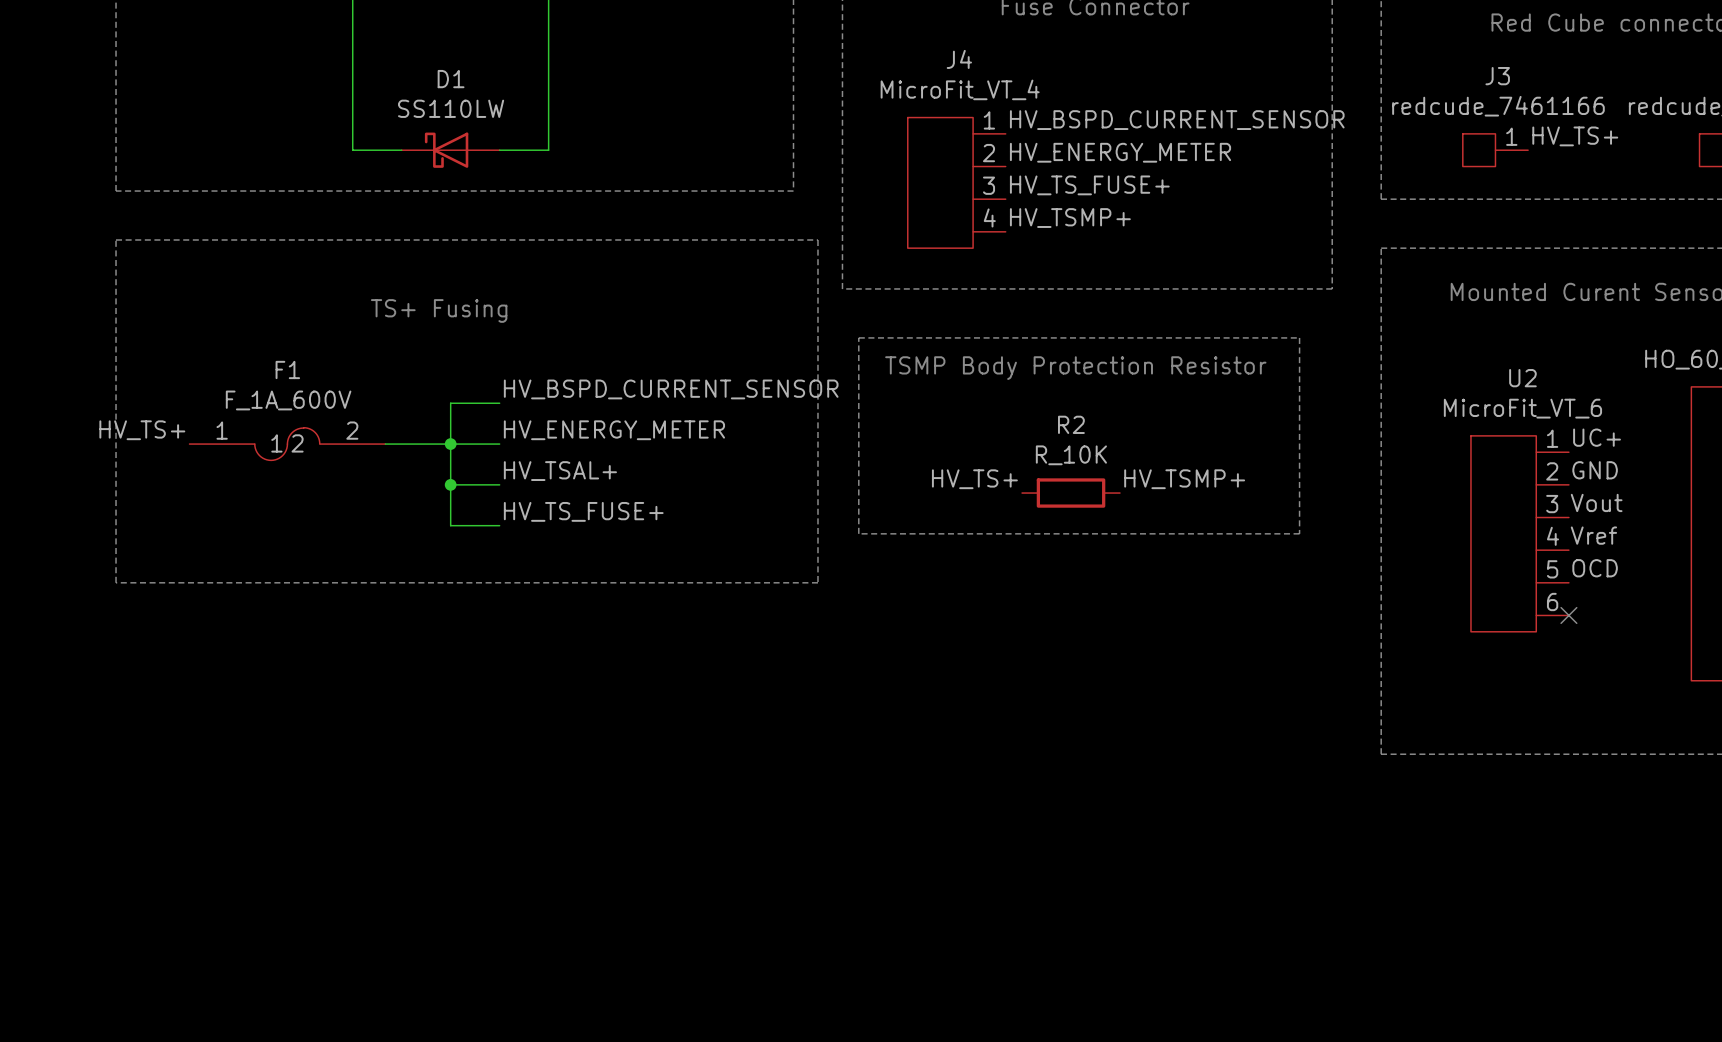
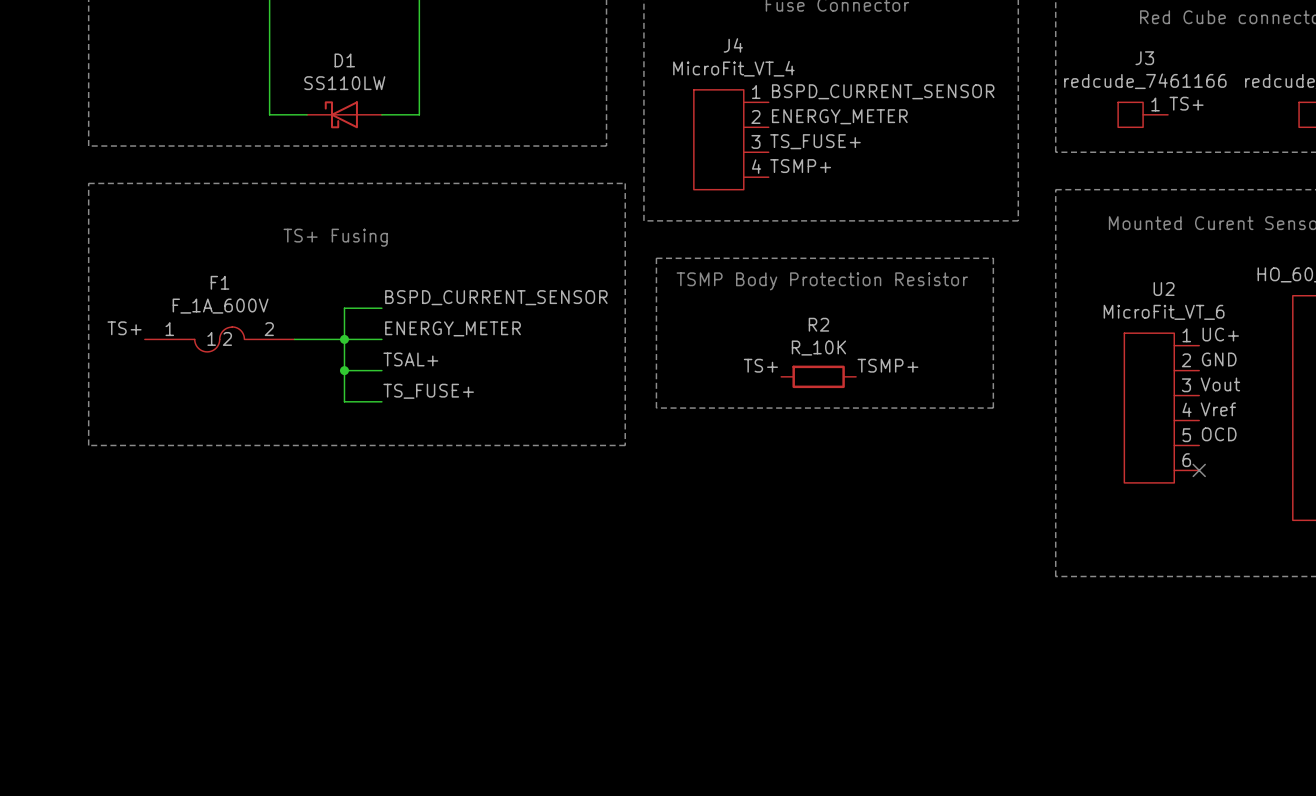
label: HV_BSPD_CURRENT_SENSOR (1177, 120) -> BSPD_CURRENT_SENSOR (883, 91)
label: HV_TS+ (1575, 136) -> TS+ (1186, 103)
label: HV_ENERGY_METER (1120, 152) -> ENERGY_METER (839, 116)
label: HV_TS_FUSE+ (1089, 185) -> TS_FUSE+ (815, 141)
label: HV_TSMP+ (1070, 218) -> TSMP+ (800, 166)
label: HV_BSPD_CURRENT_SENSOR (671, 389) -> BSPD_CURRENT_SENSOR (496, 297)
label: HV_TS+ (142, 430) -> TS+ (124, 328)
label: HV_ENERGY_METER (614, 430) -> ENERGY_METER (453, 328)
label: HV_TSAL+ (560, 471) -> TSAL+ (410, 359)
label: HV_TS+ (974, 479) -> TS+ (760, 365)
label: HV_TSMP+ (1184, 479) -> TSMP+ (887, 365)
label: HV_TS_FUSE+ (583, 511) -> TS_FUSE+ (428, 391)

